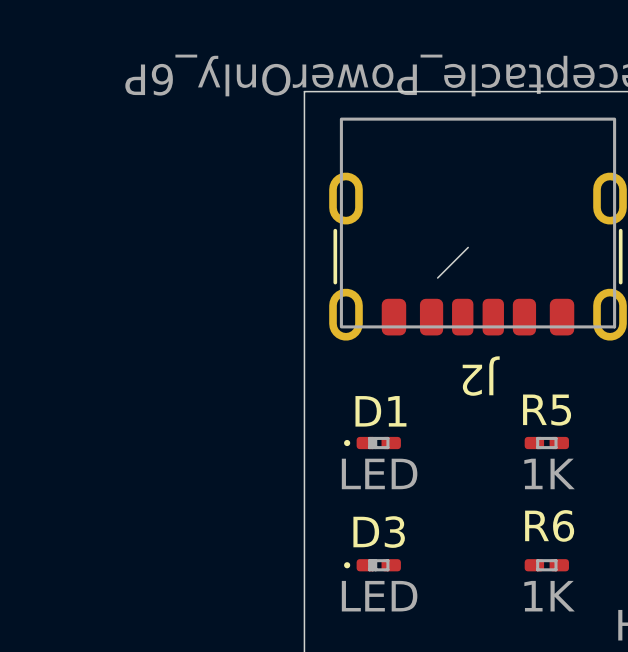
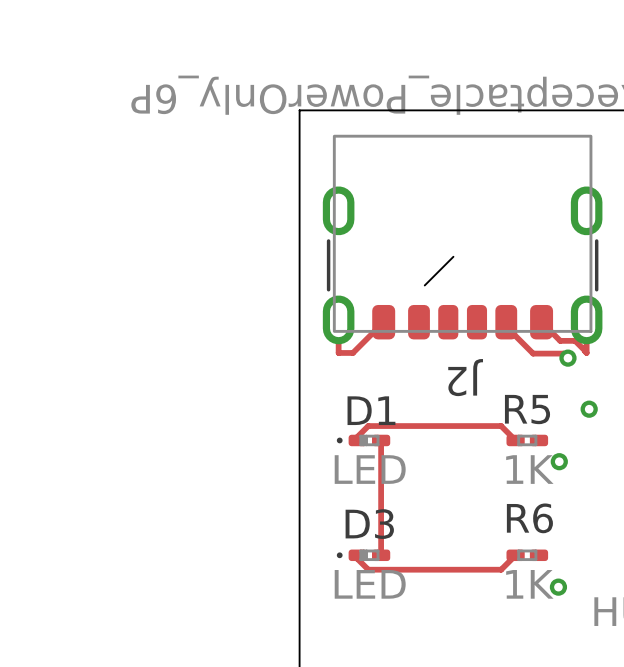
track: none -> (338, 319) (338, 352) (352, 352) (383, 322)
track: none -> (586, 319) (586, 352) (575, 340) (560, 340) (541, 322)
track: none -> (506, 322) (506, 326) (533, 353) (563, 353) (567, 358)
via: none -> (567, 358)
via: none -> (589, 409)
track: none -> (357, 440) (357, 436) (368, 426) (501, 426) (515, 440)
track: none -> (381, 440) (381, 555)
via: none -> (559, 461)
track: none -> (357, 555) (357, 559) (368, 569) (501, 569) (515, 555)
via: none -> (558, 587)

